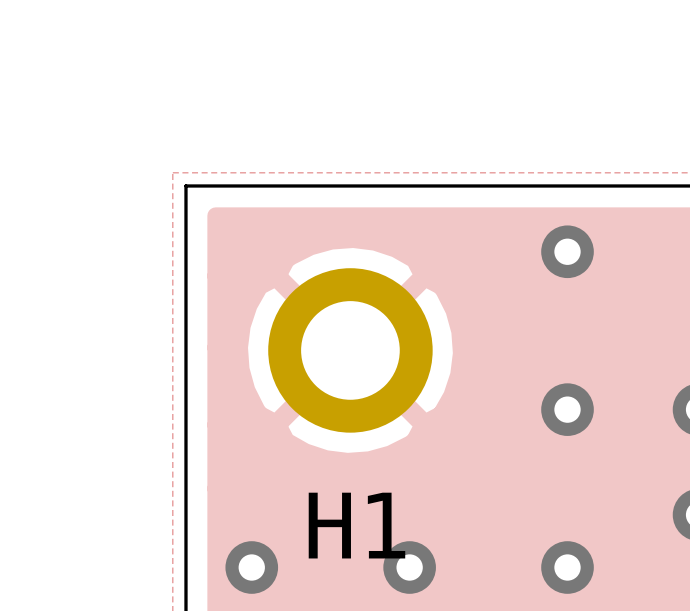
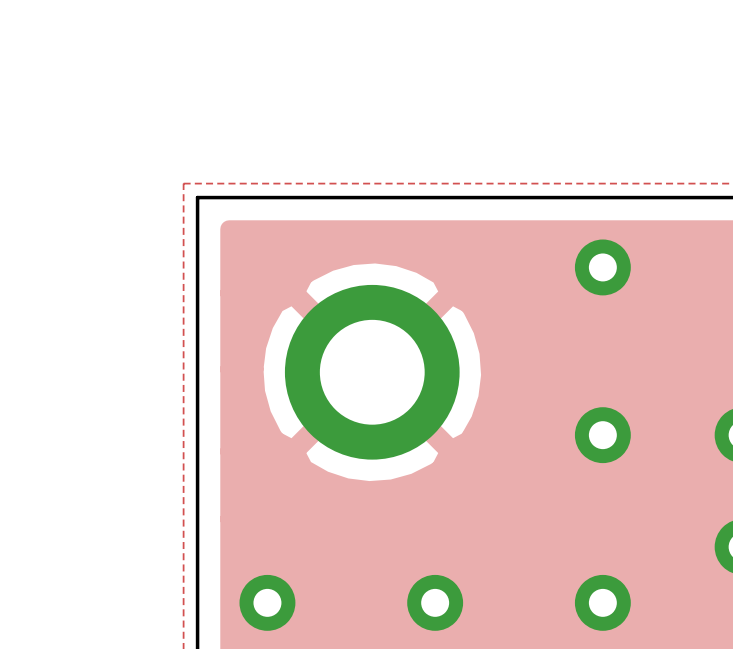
H1 name: H1 (356, 525) -> none

